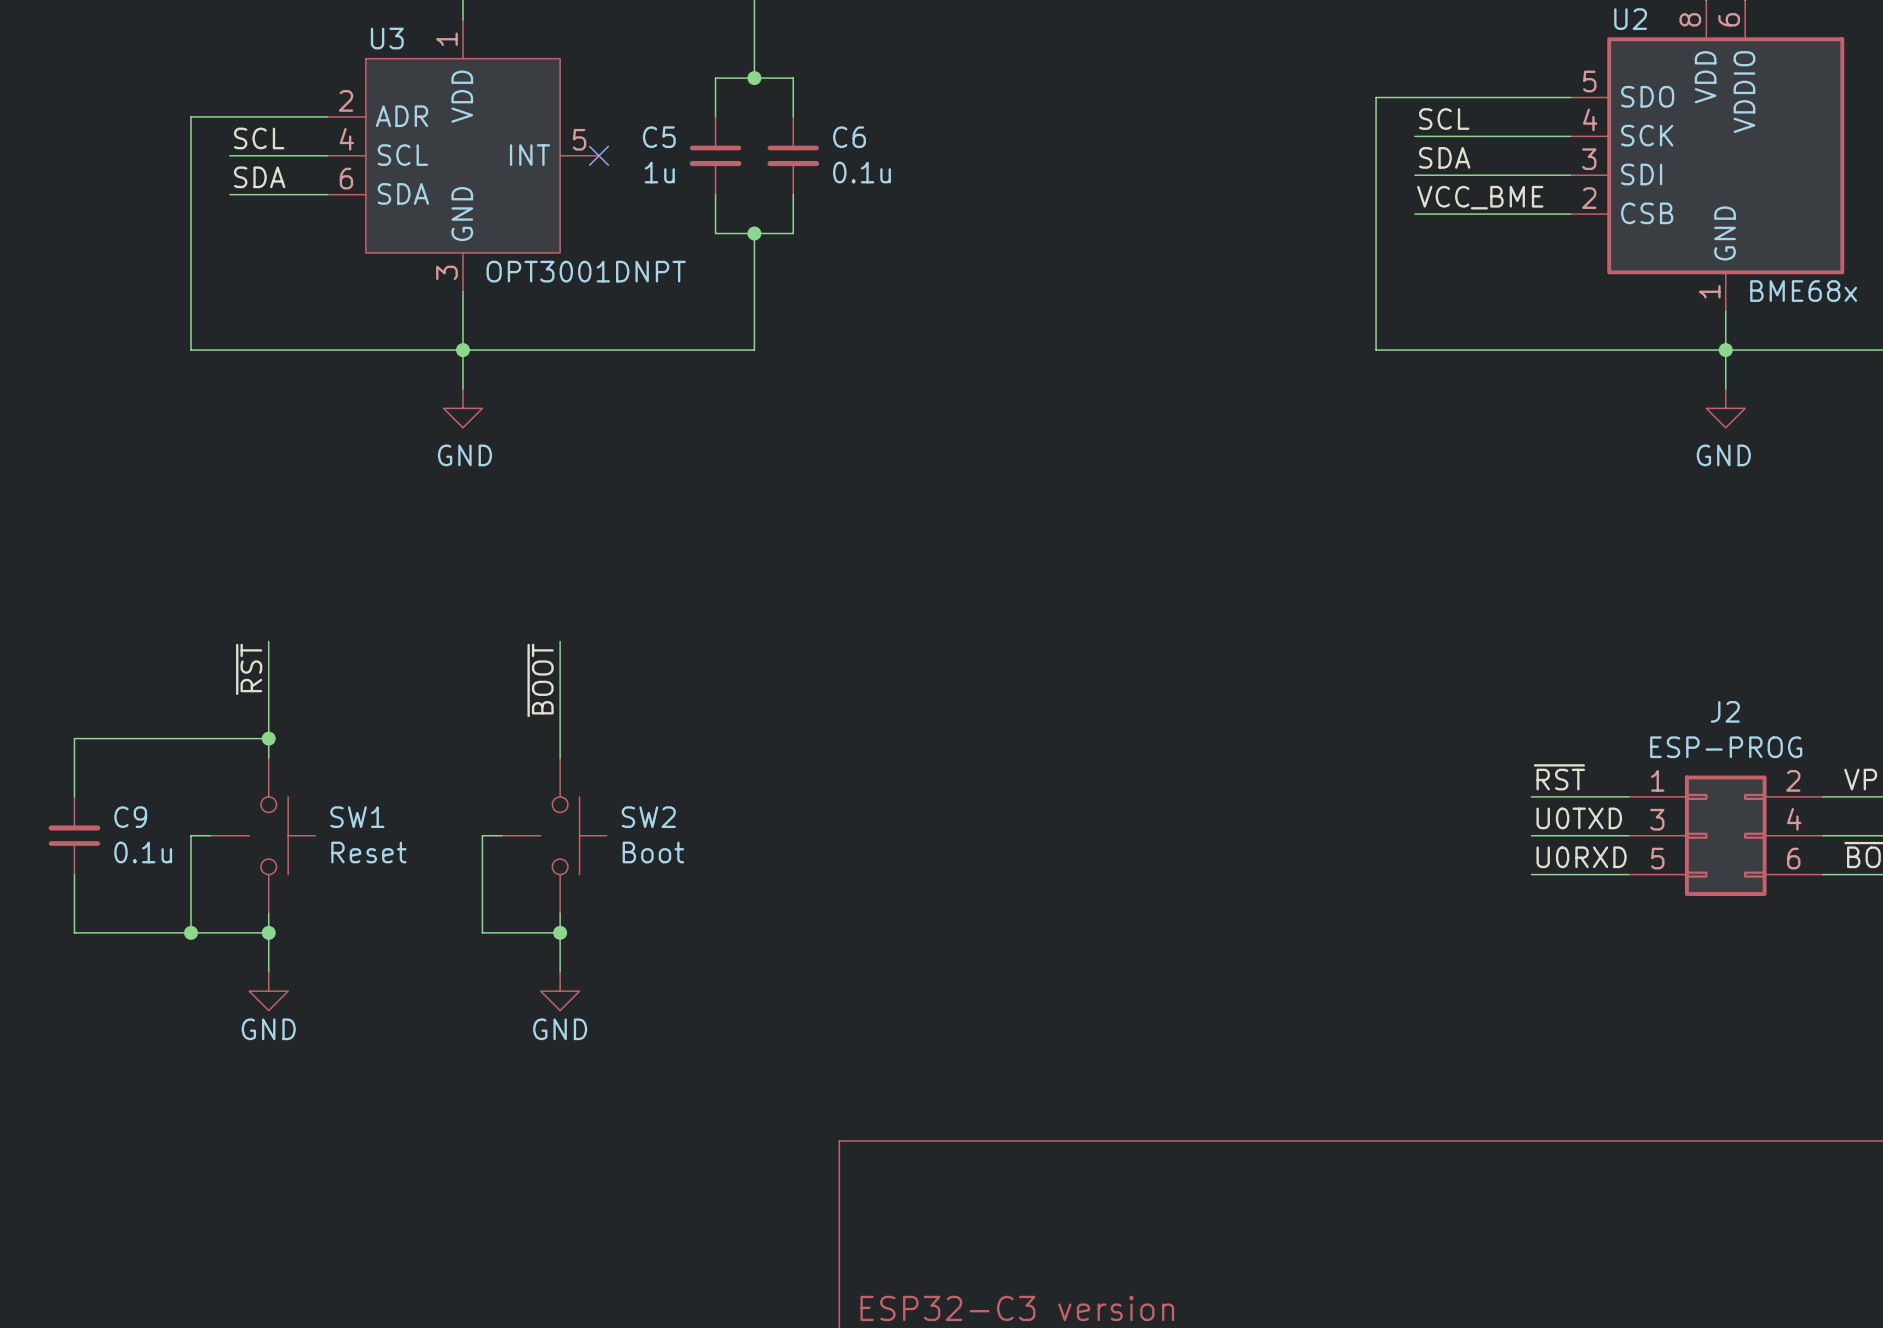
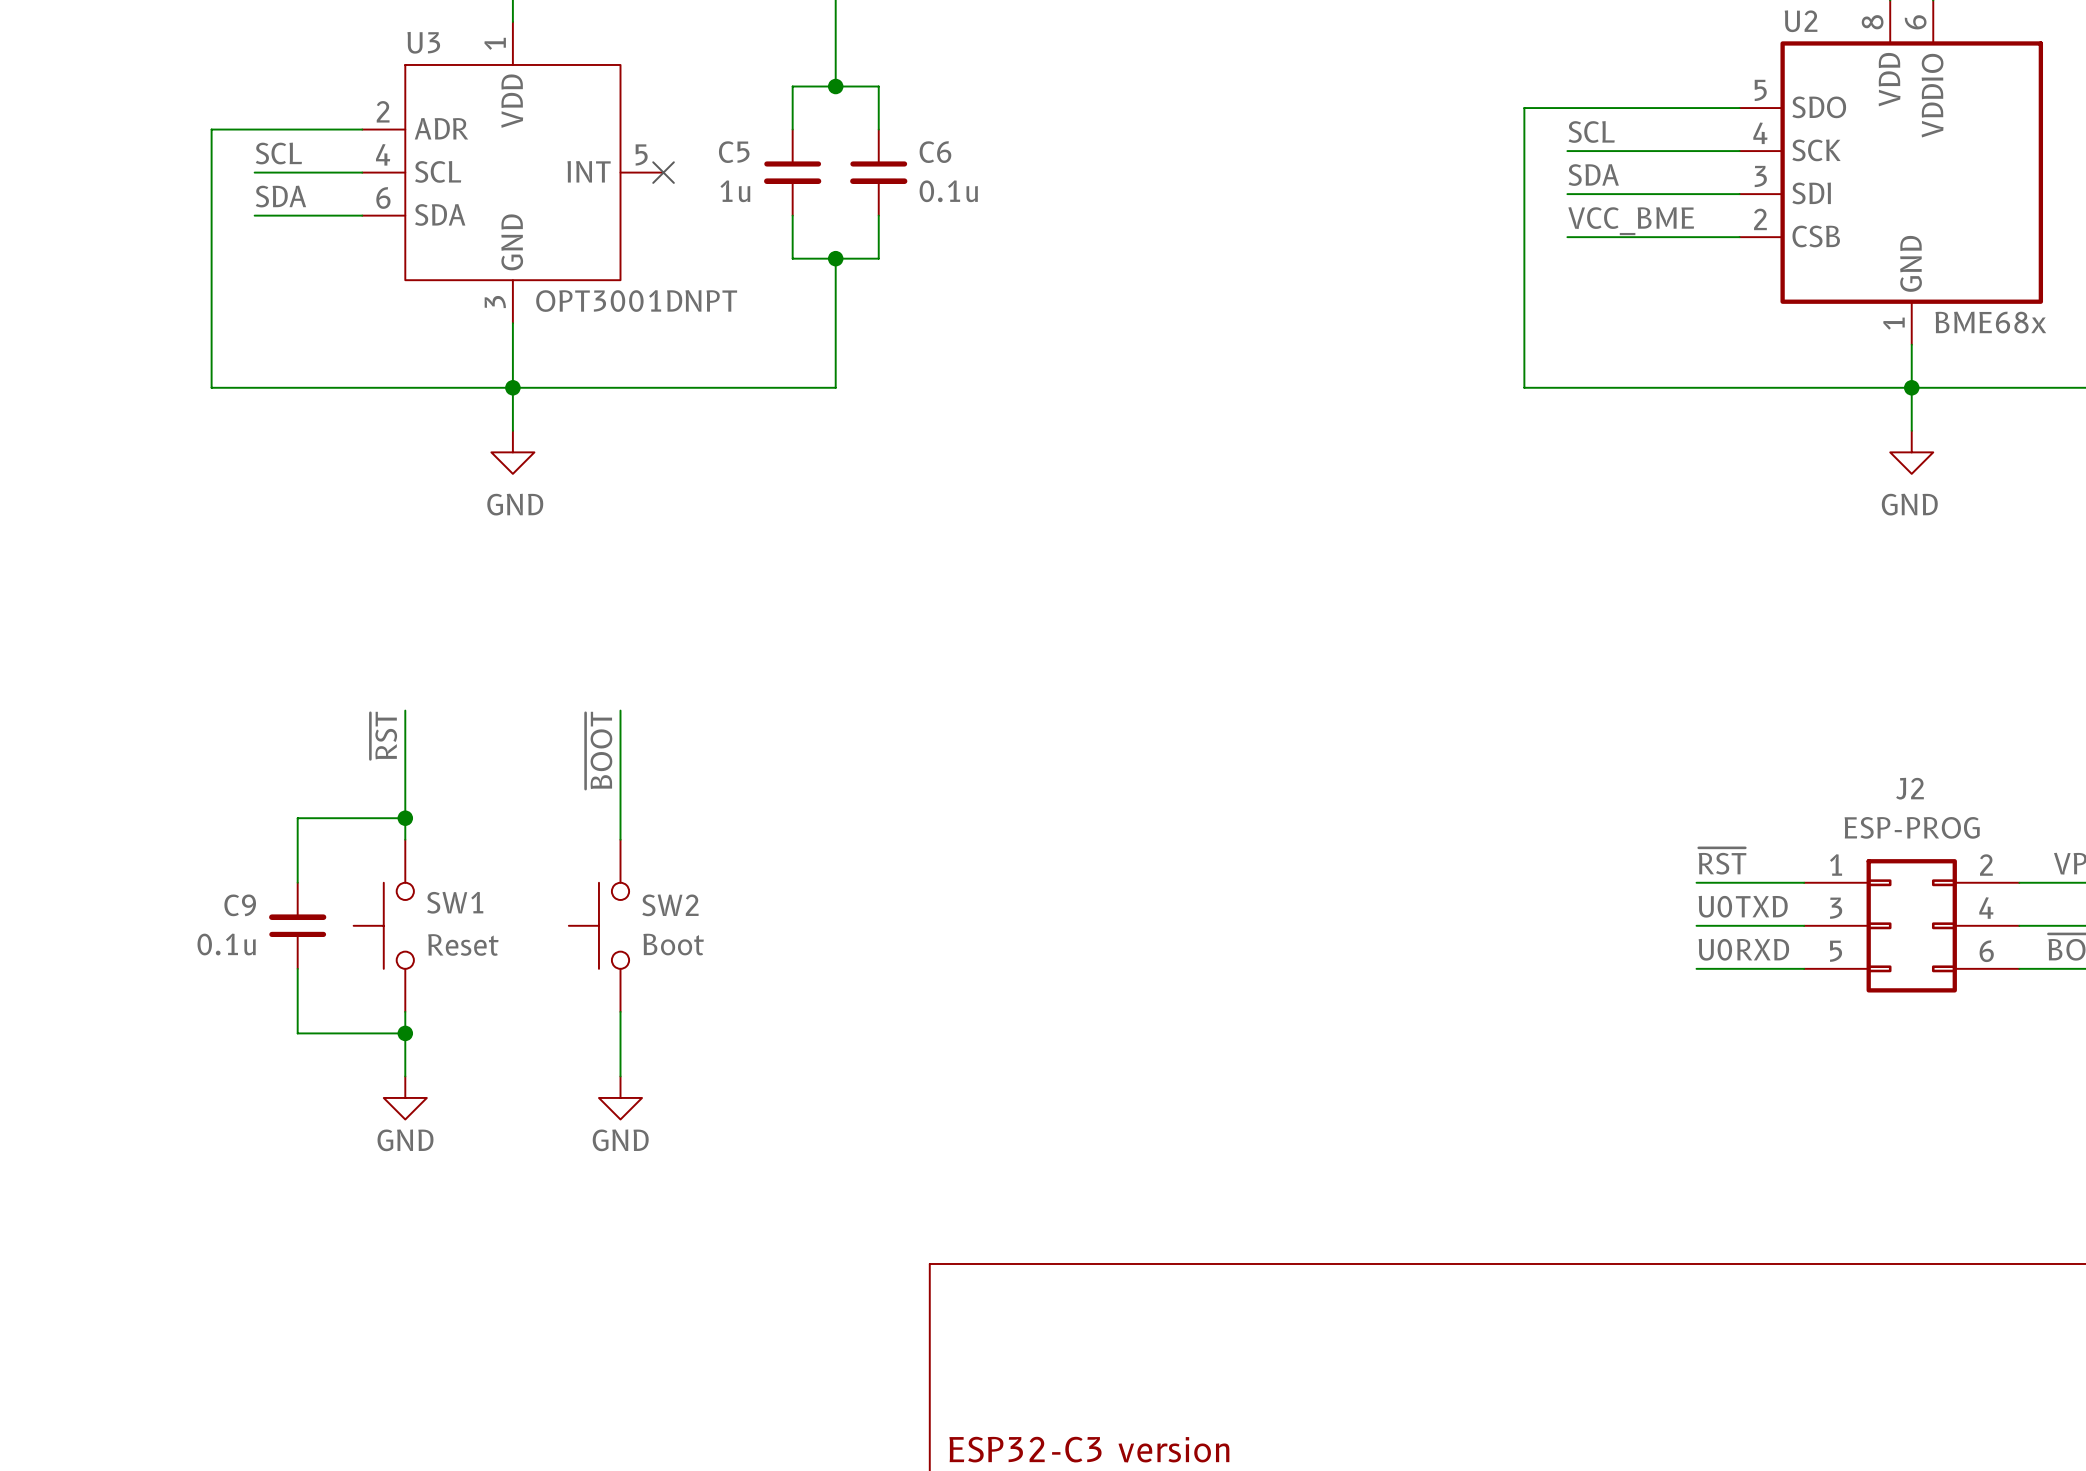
wire: (268, 641) (268, 738) (74, 738) (74, 796) -> none
wire: none -> (405, 710) (405, 839)
label position: ~{RST} (249, 669) -> ~{RST} (383, 735)
wire: none -> (297, 818) (405, 818)
junction: (268, 738) -> none
junction: none -> (405, 818)
SW1 symbol: [210, 758, 316, 914] -> [353, 839, 414, 1012]
SW2 symbol: [501, 758, 607, 914] -> [568, 839, 630, 1012]
C9 name position: C9 (130, 817) -> C9 (240, 905)
C9 position: (74, 835) -> (297, 925)
wire: (210, 835) (191, 835) (191, 932) -> none
wire: (501, 835) (482, 835) (482, 932) (560, 932) -> none
C9 value position: 0.1u (143, 852) -> 0.1u (226, 944)
wire: (74, 874) (74, 932) (268, 932) (268, 971) -> none
wire: none -> (405, 1011) (405, 1076)
junction: (191, 932) -> none
wire: none -> (297, 1033) (405, 1033)
junction: (268, 932) -> none
junction: none -> (405, 1033)
junction: (560, 932) -> none
power symbol position: GND (268, 991) -> GND (405, 1097)

